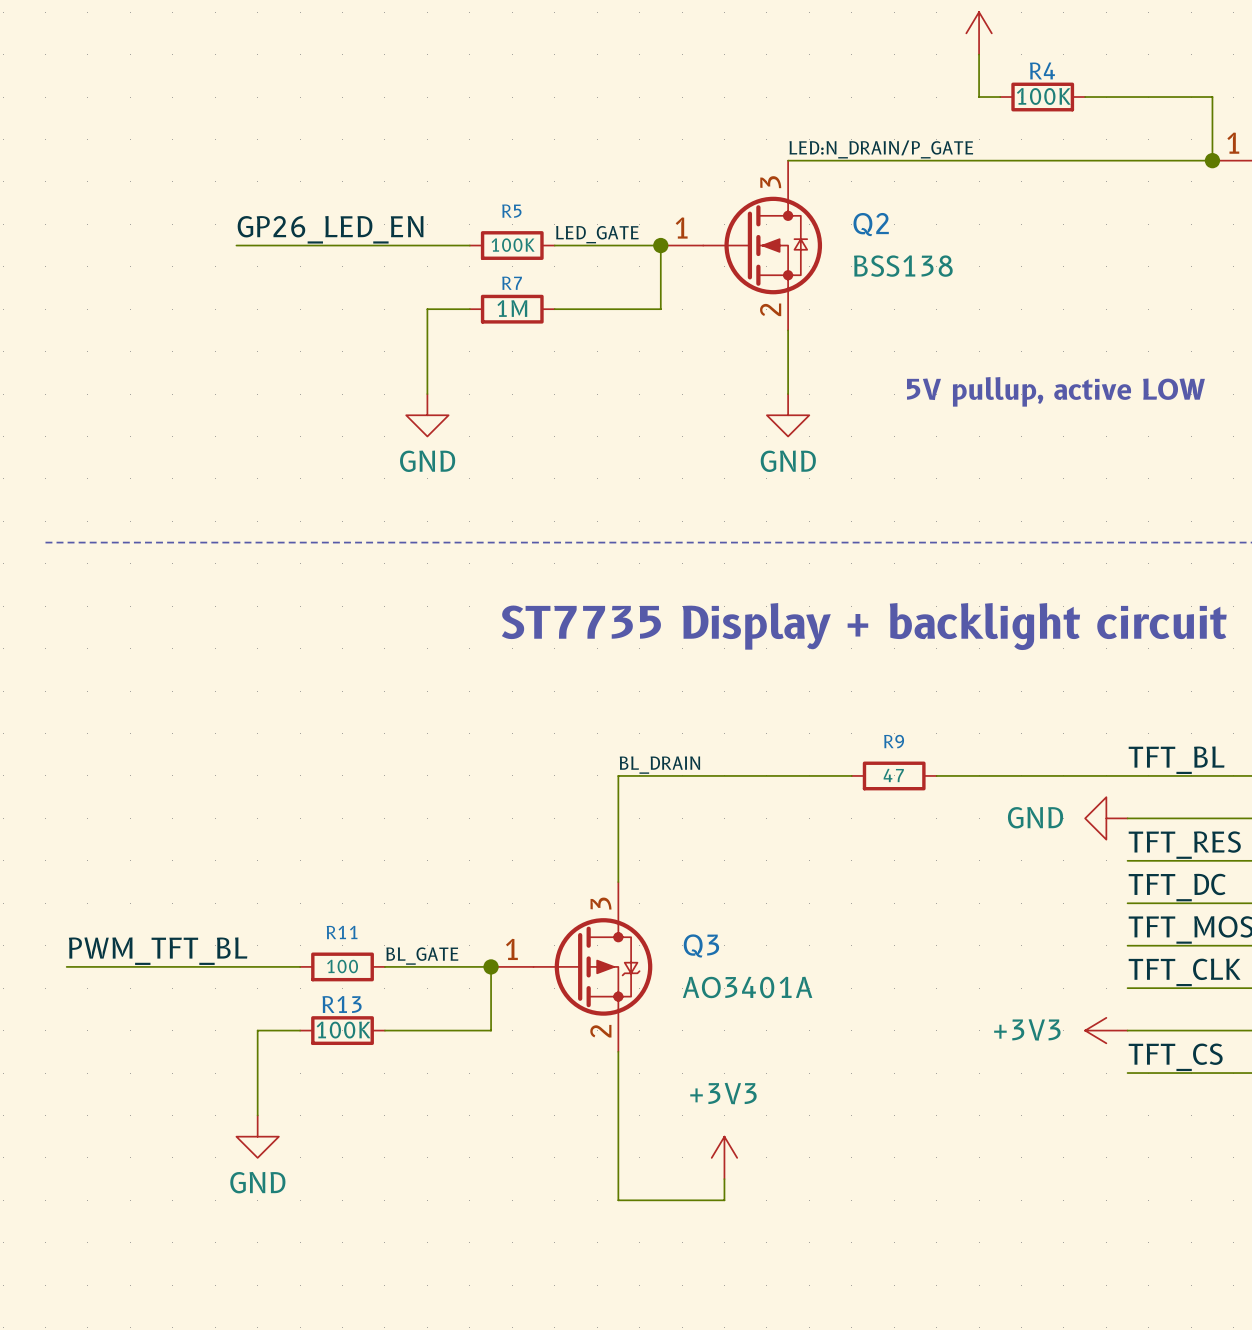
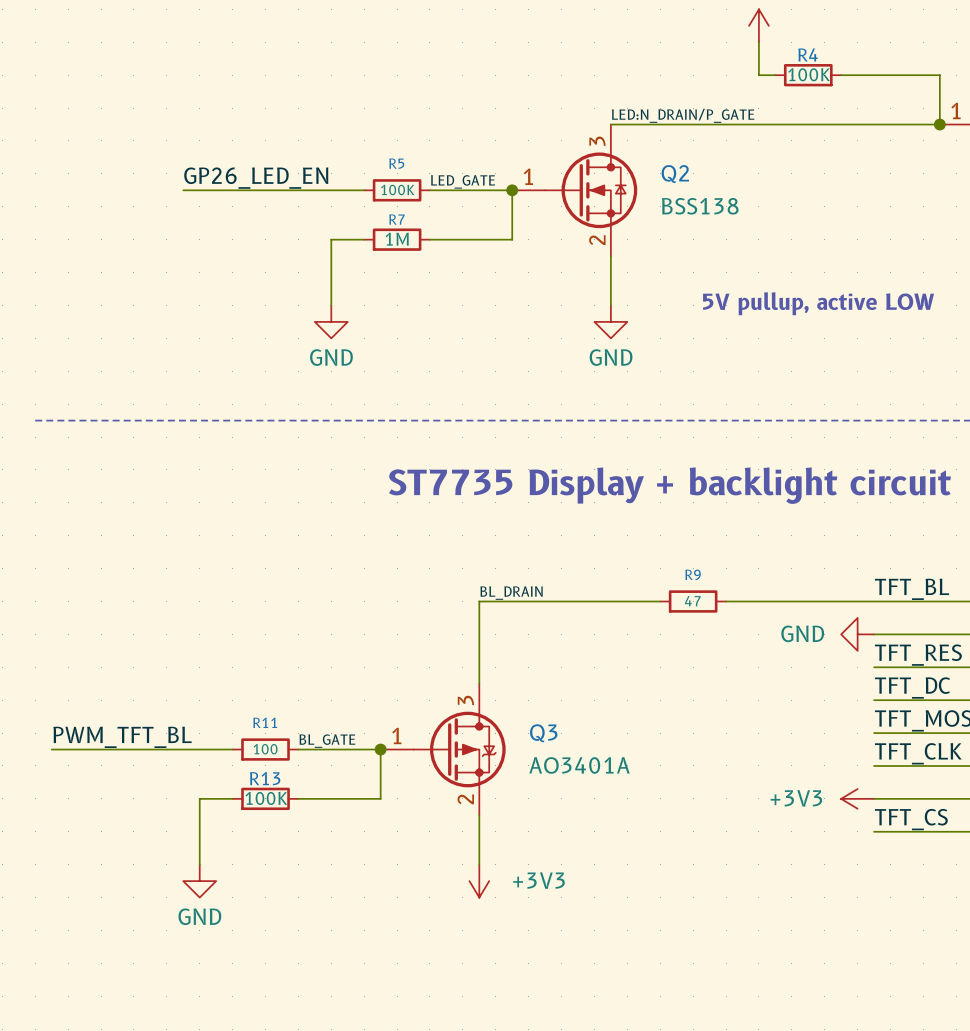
power symbol text position: +3V3 (723, 1093) -> +3V3 (539, 880)
wire: (618, 1115) (618, 1200) (724, 1200) (724, 1179) -> none
power symbol rotation: 0° (724, 1157) -> 180° (479, 881)
power symbol position: +3V3 (724, 1157) -> +3V3 (479, 881)

